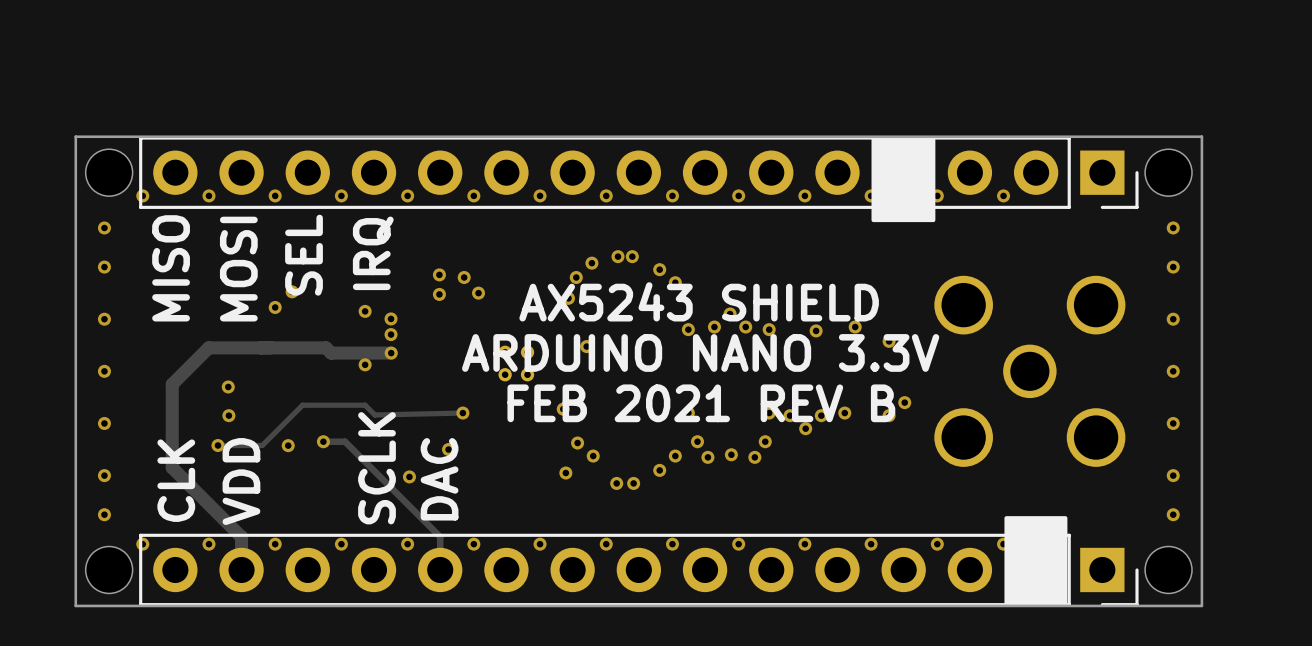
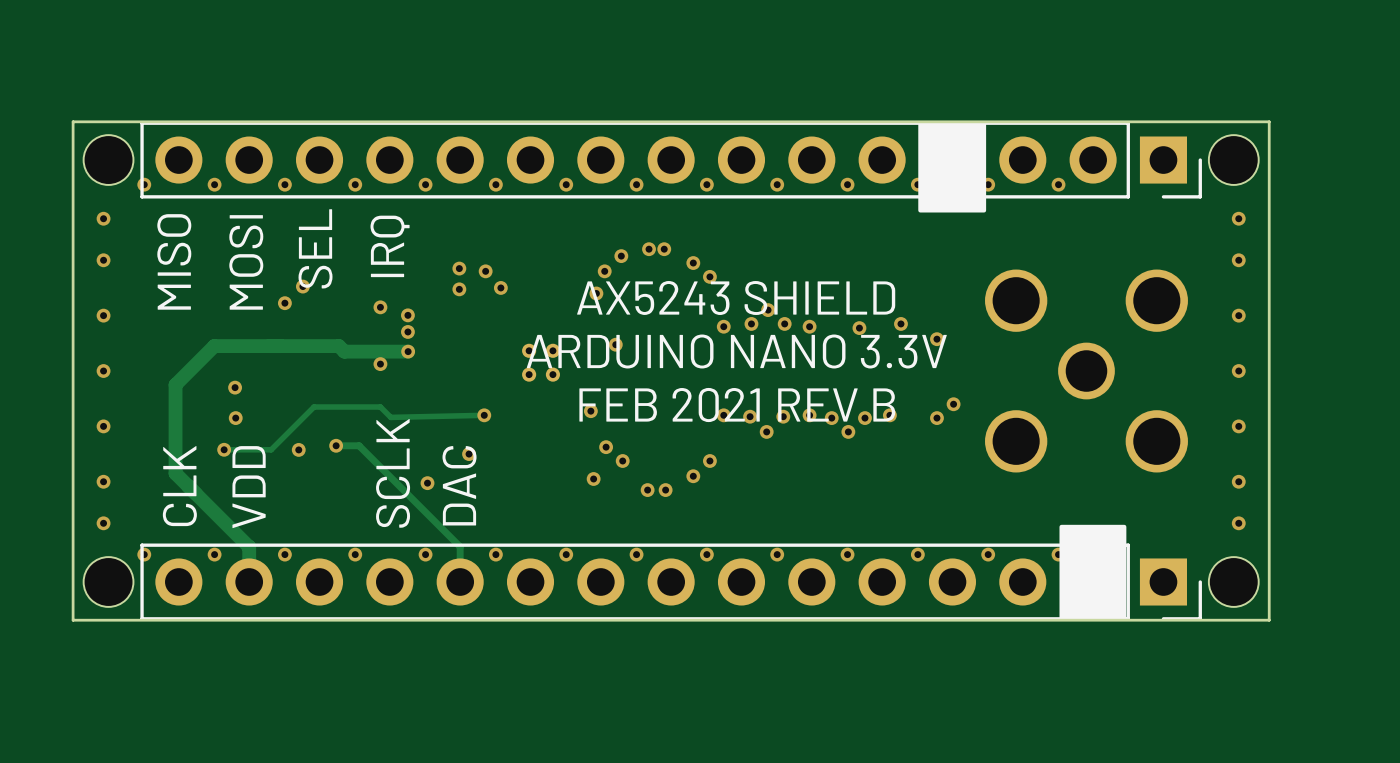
via: none -> (750, 416)
via: none -> (783, 416)
via: none -> (766, 431)
via: (697, 441) -> none
via: (765, 441) -> none
via: (731, 454) -> none
via: (707, 457) -> none
via: (754, 457) -> none

